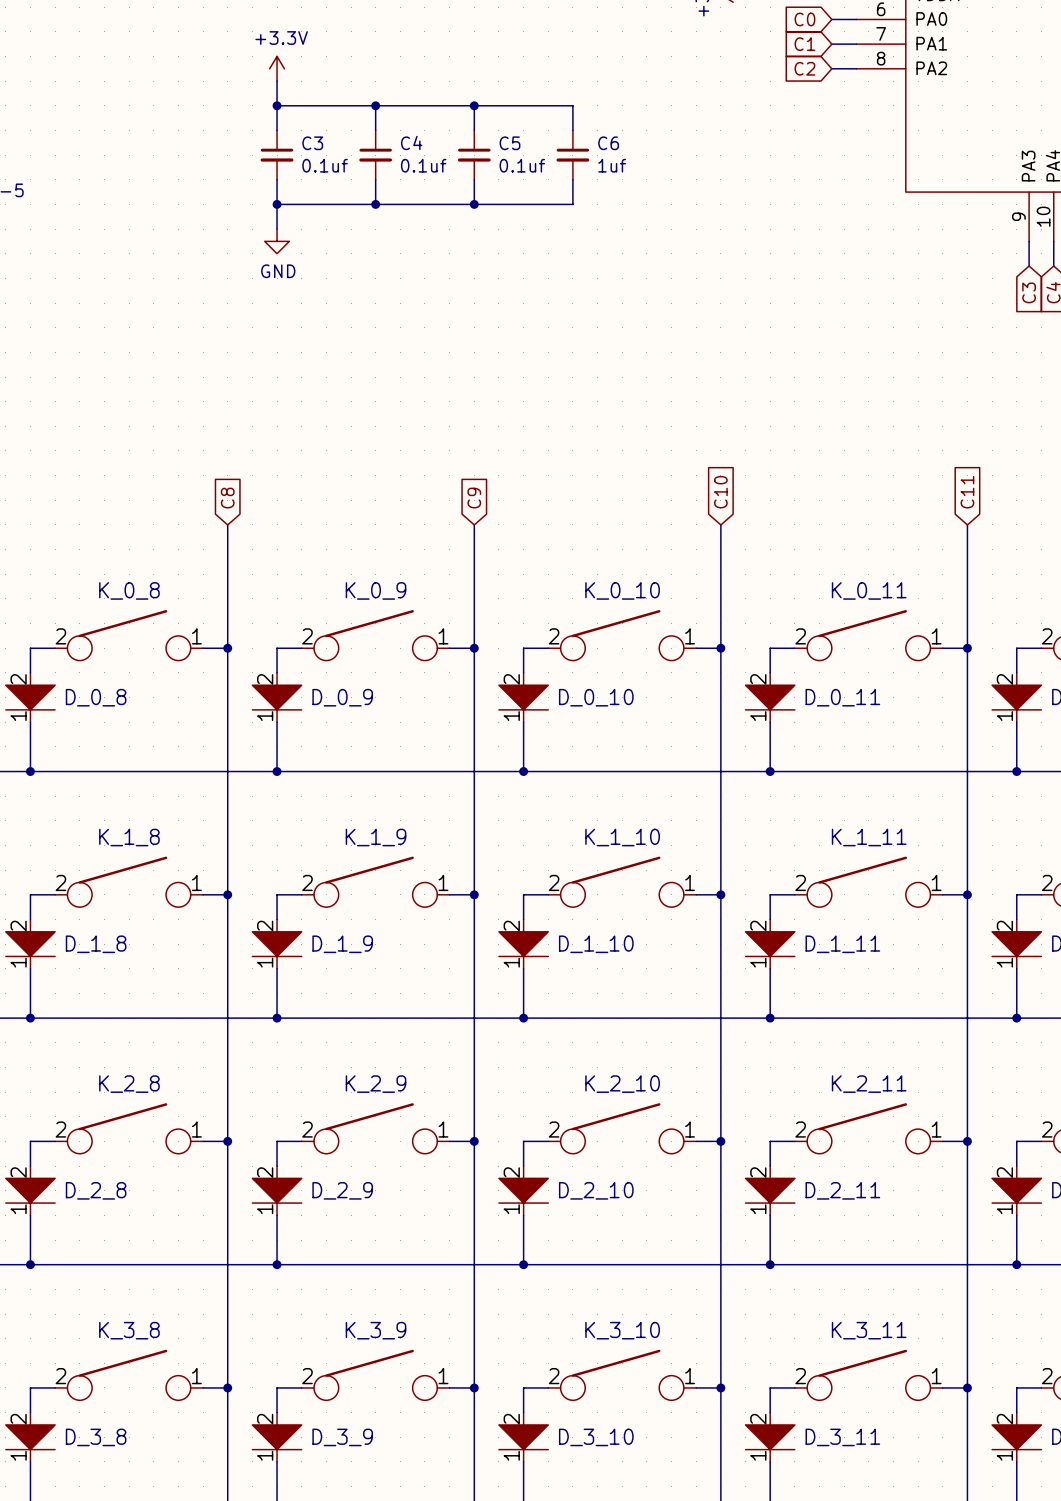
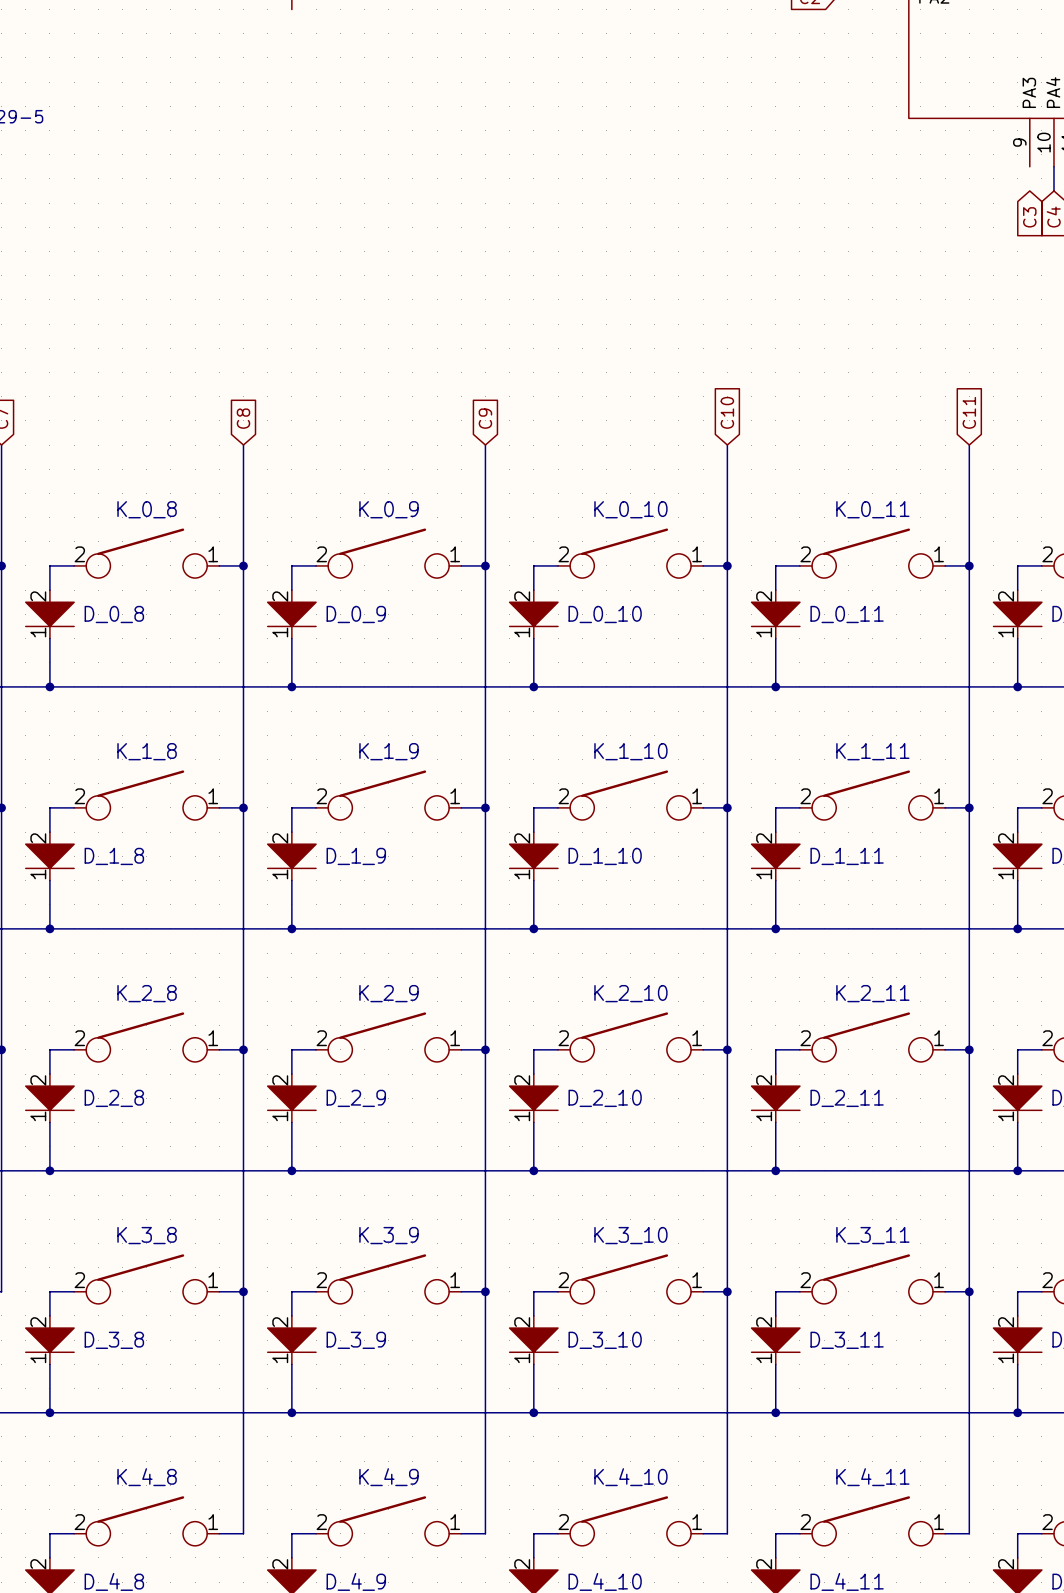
wire: (277, 81) (277, 130) -> none
wire: (277, 105) (572, 105) (572, 130) -> none
junction: (277, 105) -> none
wire: (375, 105) (375, 130) -> none
junction: (375, 105) -> none
wire: (474, 105) (474, 130) -> none
junction: (474, 105) -> none
C3: 0.1uf (277, 155) -> none
C4: 0.1uf (375, 155) -> none
C5: 0.1uf (474, 155) -> none
C6: 1uf (572, 155) -> none
wire: (277, 179) (277, 229) -> none
wire: (375, 179) (375, 204) -> none
wire: (474, 179) (474, 204) -> none
wire: (572, 179) (572, 204) (277, 204) -> none
junction: (277, 204) -> none
junction: (375, 204) -> none
junction: (474, 204) -> none
power symbol: GND (277, 241) -> none
wire: (1029, 241) (1029, 266) -> none

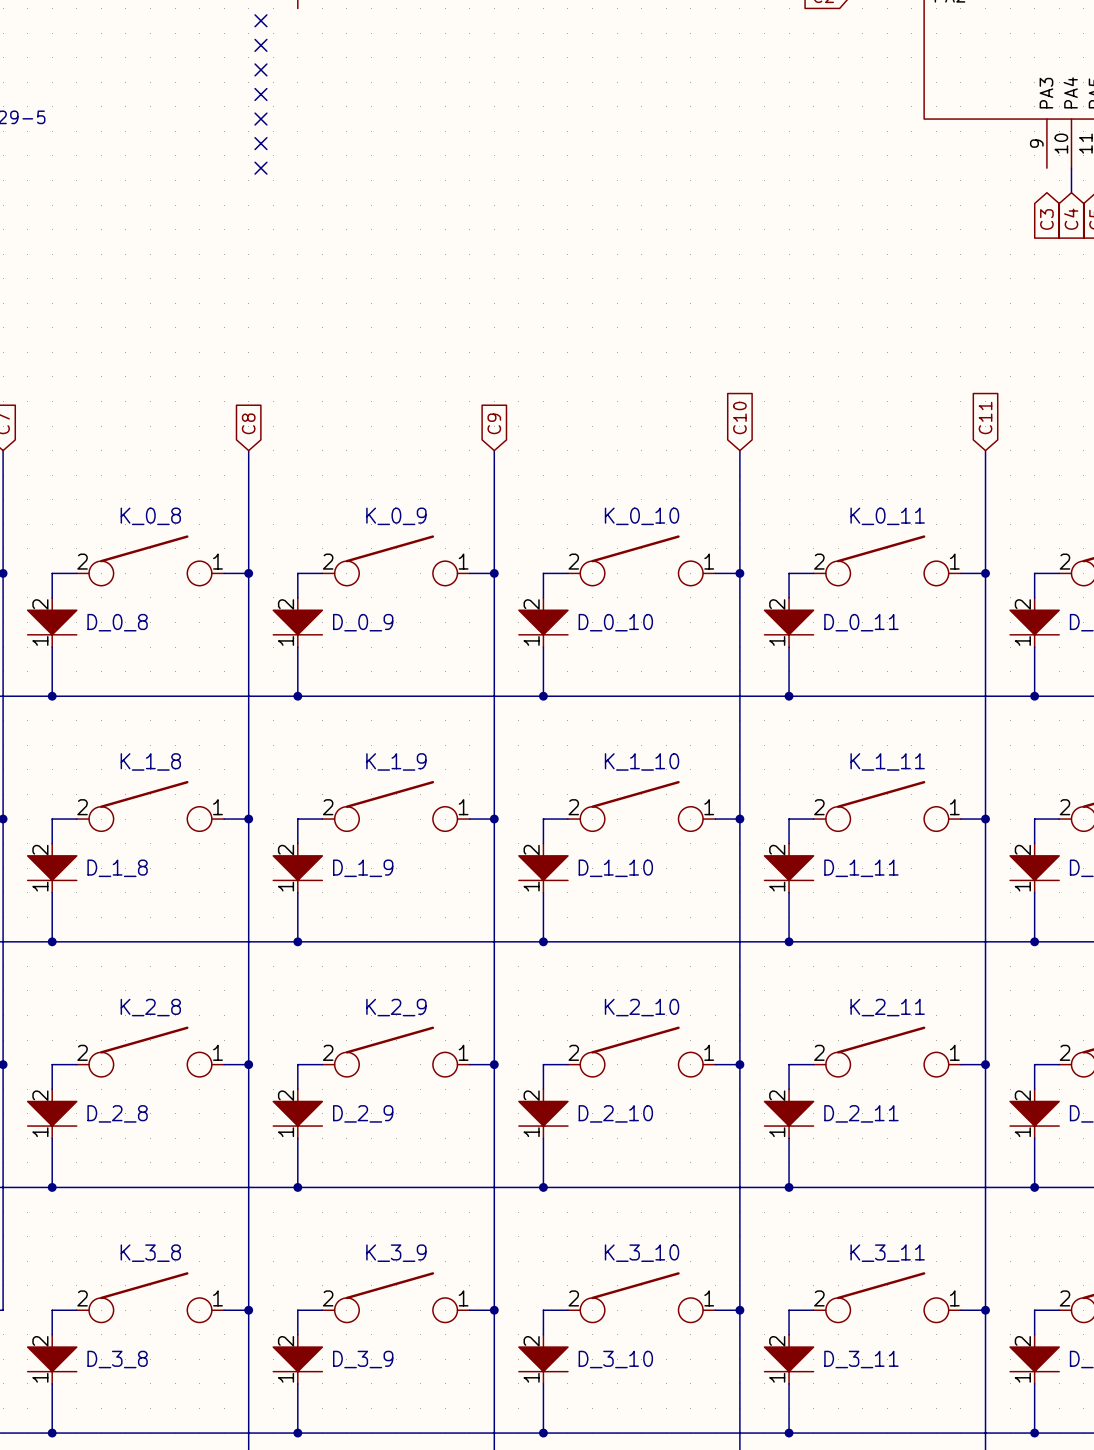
no-connect mark: none -> (260, 20)
no-connect mark: none -> (260, 45)
no-connect mark: none -> (260, 69)
no-connect mark: none -> (260, 94)
no-connect mark: none -> (260, 119)
no-connect mark: none -> (260, 143)
no-connect mark: none -> (260, 168)

